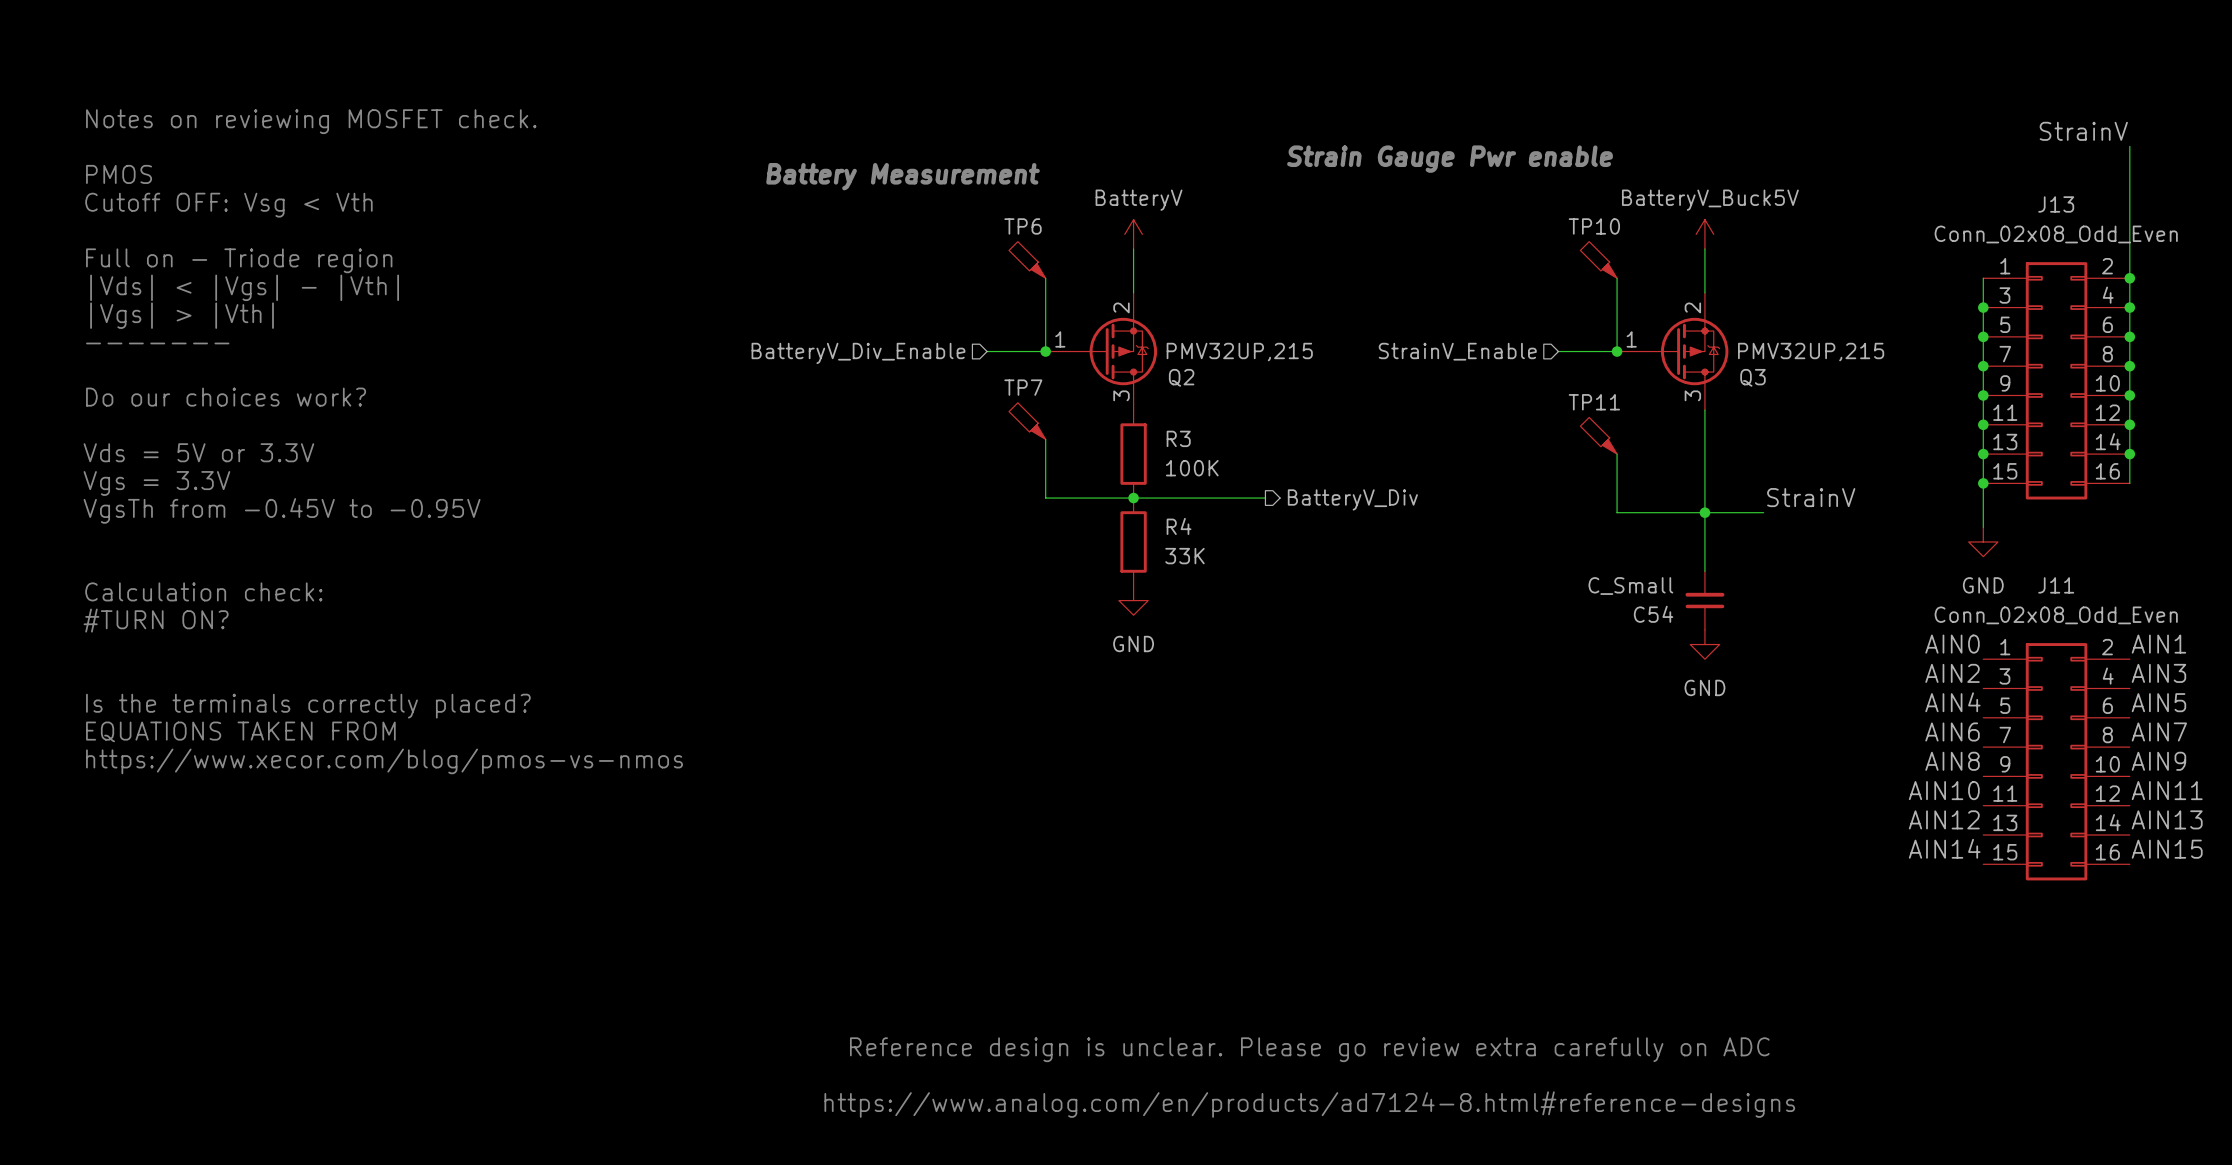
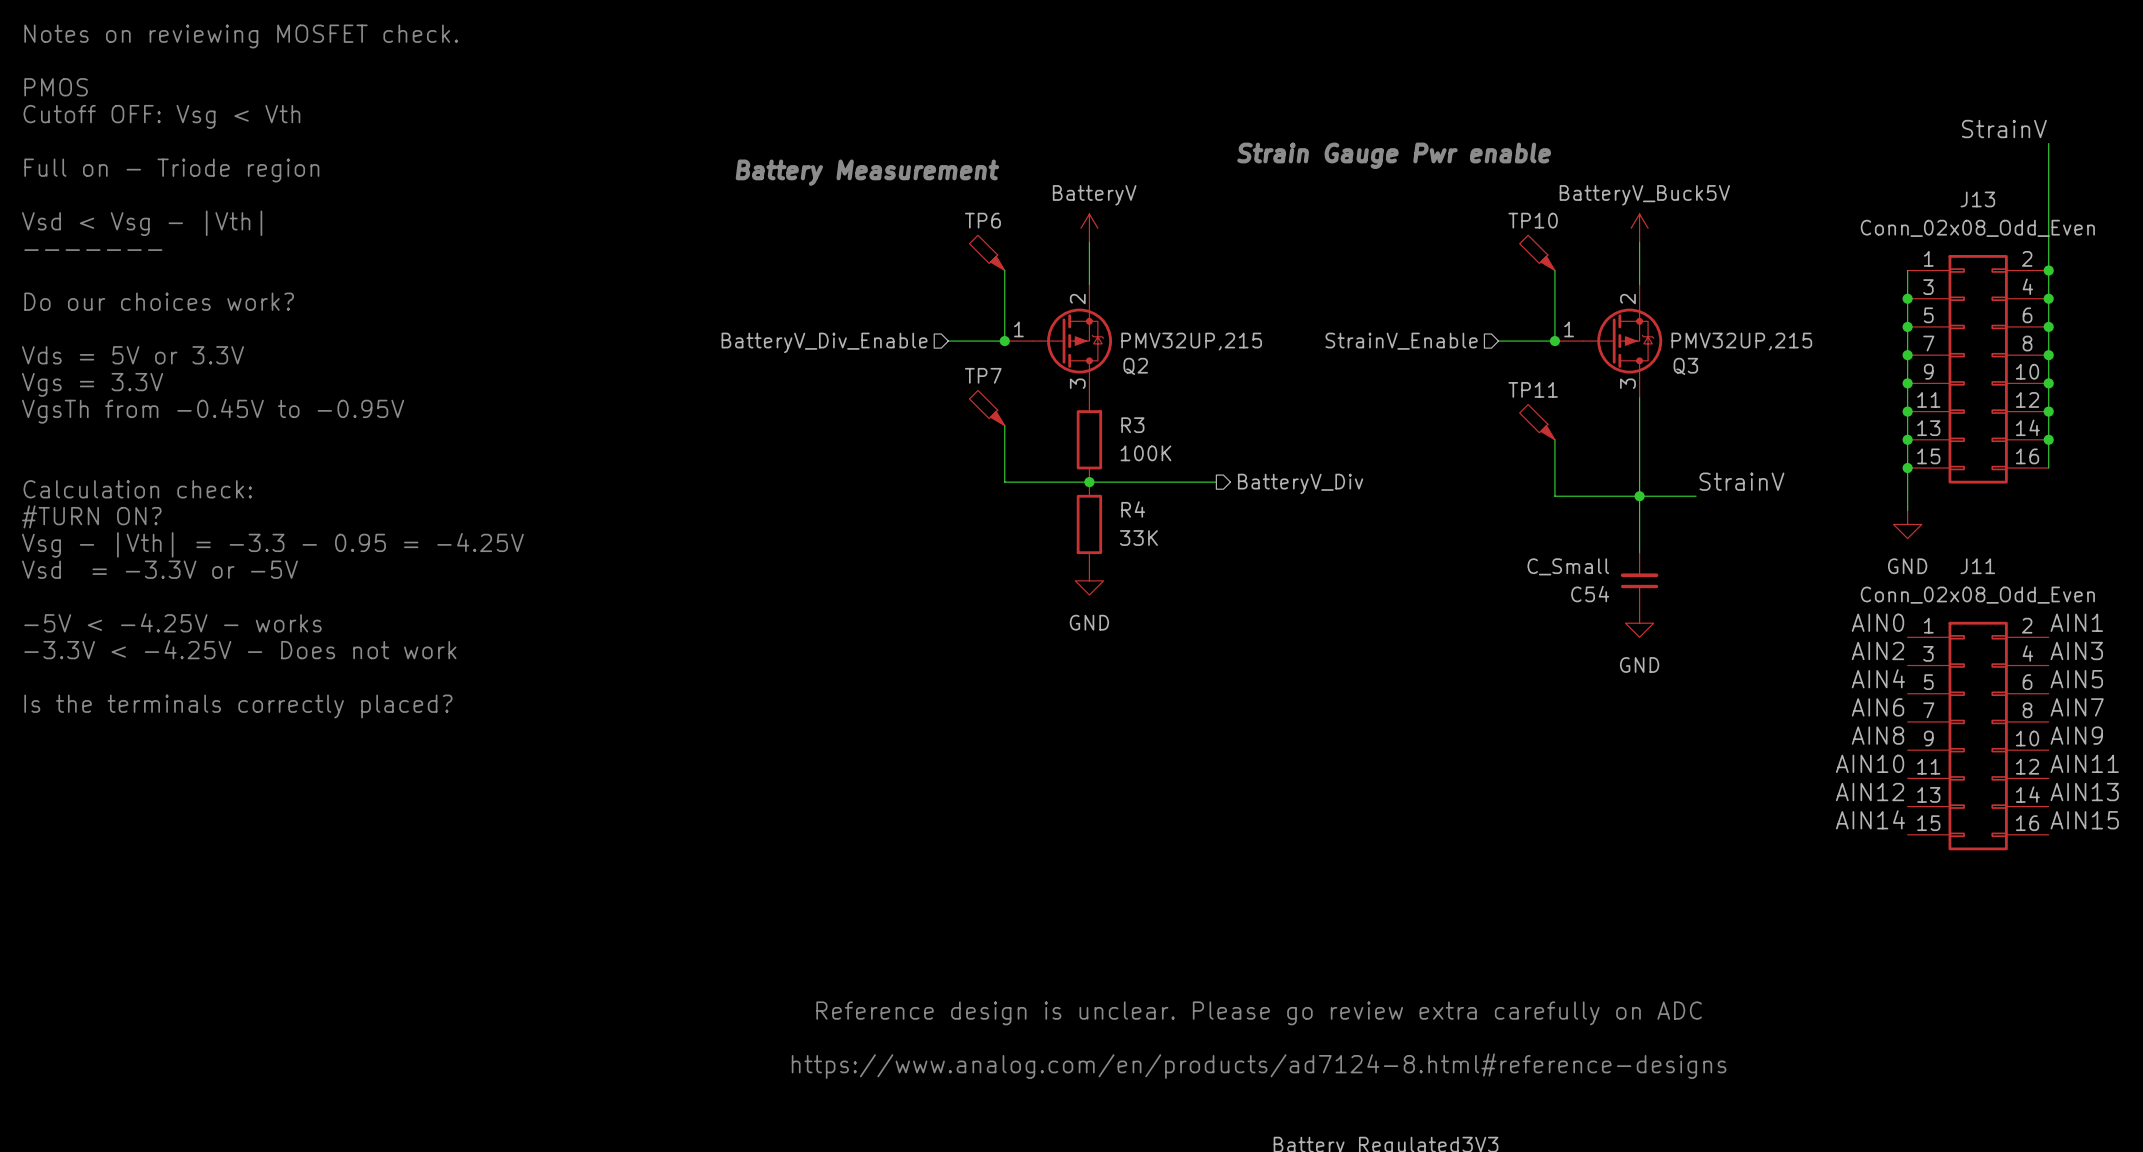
text position: Notes on reviewing MOSFET check. (311, 121) -> Notes on reviewing MOSFET check. (241, 36)
text position: PMOS (119, 174) -> PMOS (56, 87)
text position: Cutoff OFF: Vsg < Vth (228, 205) -> Cutoff OFF: Vsg < Vth (161, 116)
text: none -> Vsd < Vsg - |Vth| (142, 223)
text position: Full on - Triode region (239, 260) -> Full on - Triode region (171, 170)
text: |Vds| < |Vgs| - |Vth| (244, 287) -> none
text: |Vgs| > |Vth| (182, 315) -> none
text position: ------- (157, 343) -> ------- (93, 250)
text position: Do our choices work? (226, 397) -> Do our choices work? (159, 301)
text position: Vds = 5V or 3.3V (198, 452) -> Vds = 5V or 3.3V (132, 355)
text position: Vgs = 3.3V (156, 483) -> Vgs = 3.3V (92, 384)
text position: VgsTh from -0.45V to -0.95V (282, 510) -> VgsTh from -0.45V to -0.95V (213, 411)
text: none -> Vsg - |Vth| = -3.3 - 0.95 = -4.25V (272, 544)
text: none -> Vsd = -3.3V or -5V (159, 569)
text position: Calculation check: (203, 591) -> Calculation check: (137, 489)
text position: #TURN ON? (156, 620) -> #TURN ON? (91, 516)
text: none -> -5V < -4.25V - works (173, 622)
text: none -> -3.3V < -4.25V - Does not work (240, 649)
text position: Is the terminals correctly placed? (308, 706) -> Is the terminals correctly placed? (238, 706)
text: EQUATIONS TAKEN FROM (240, 731) -> none
text: https://www.xecor.com/blog/pmos-vs-nmos (384, 761) -> none

